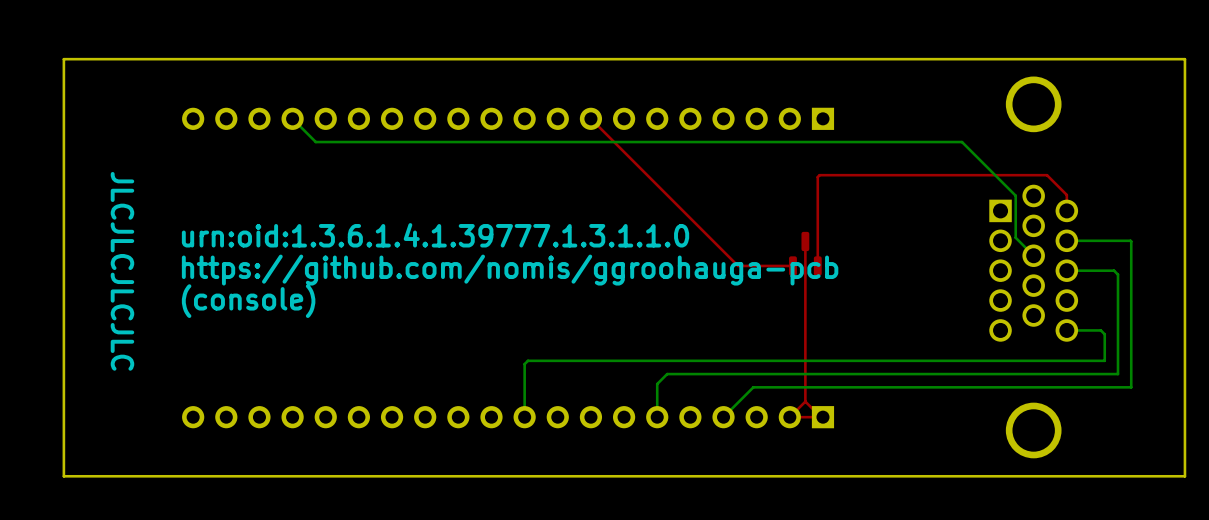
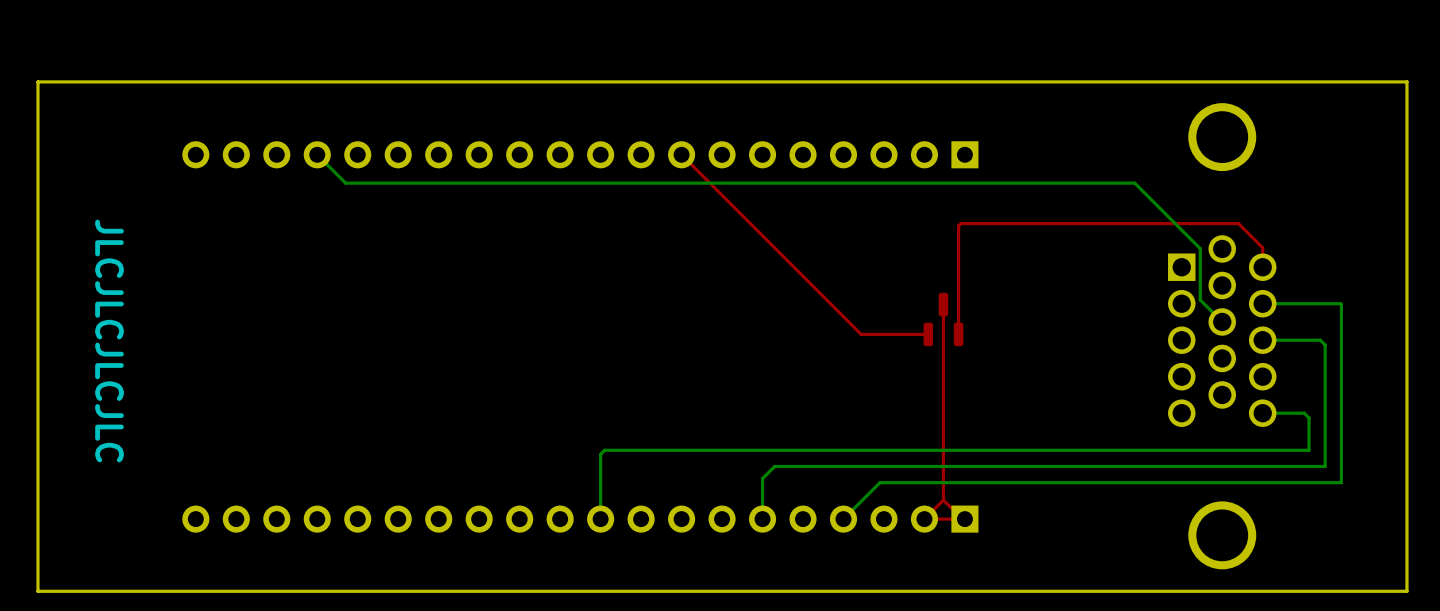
text: urn:oid:1.3.6.1.4.1.39777.1.3.1.1.0 (435, 235) -> none
text: https://github.com/nomis/ggroohauga-pcb (510, 270) -> none
text: (console) (248, 301) -> none

